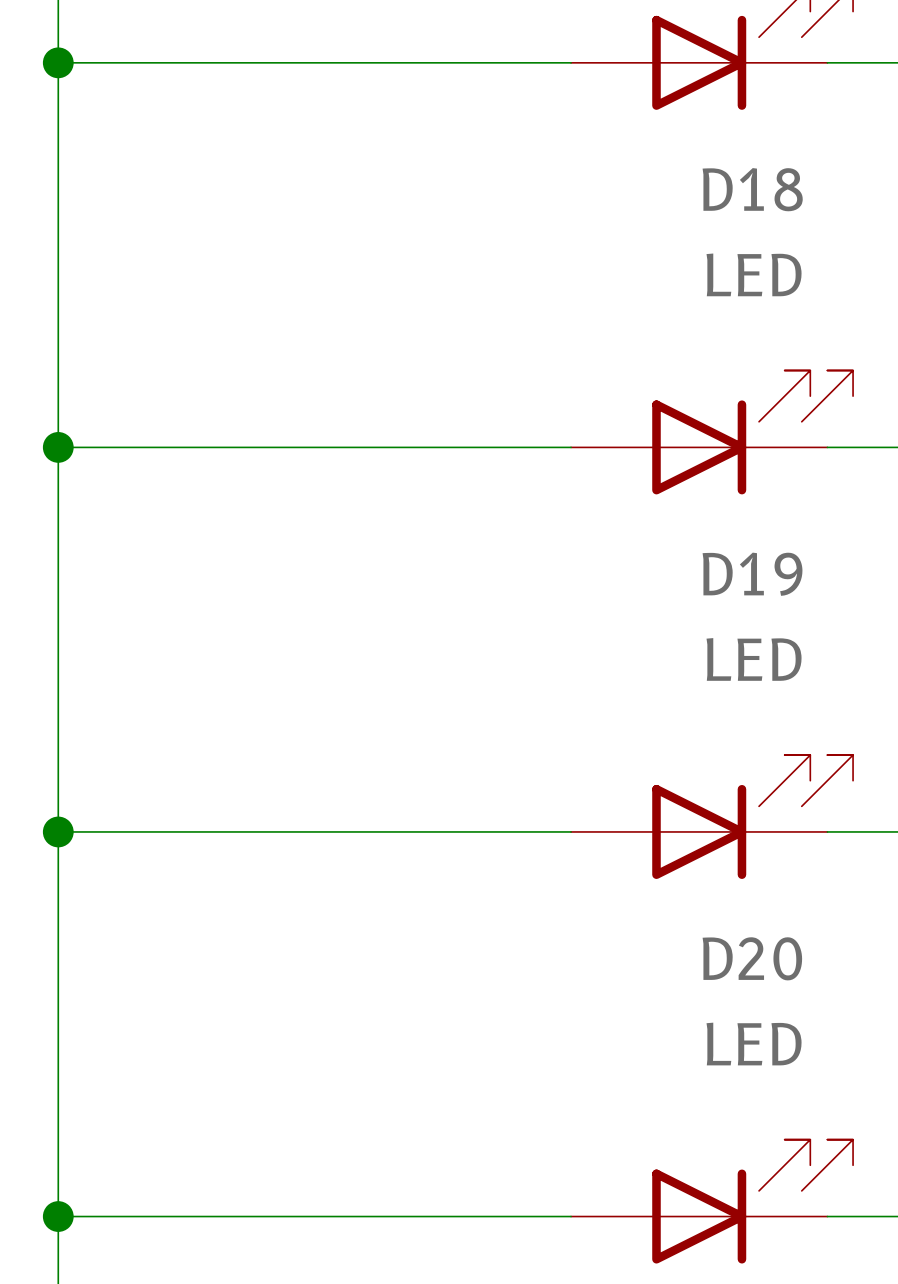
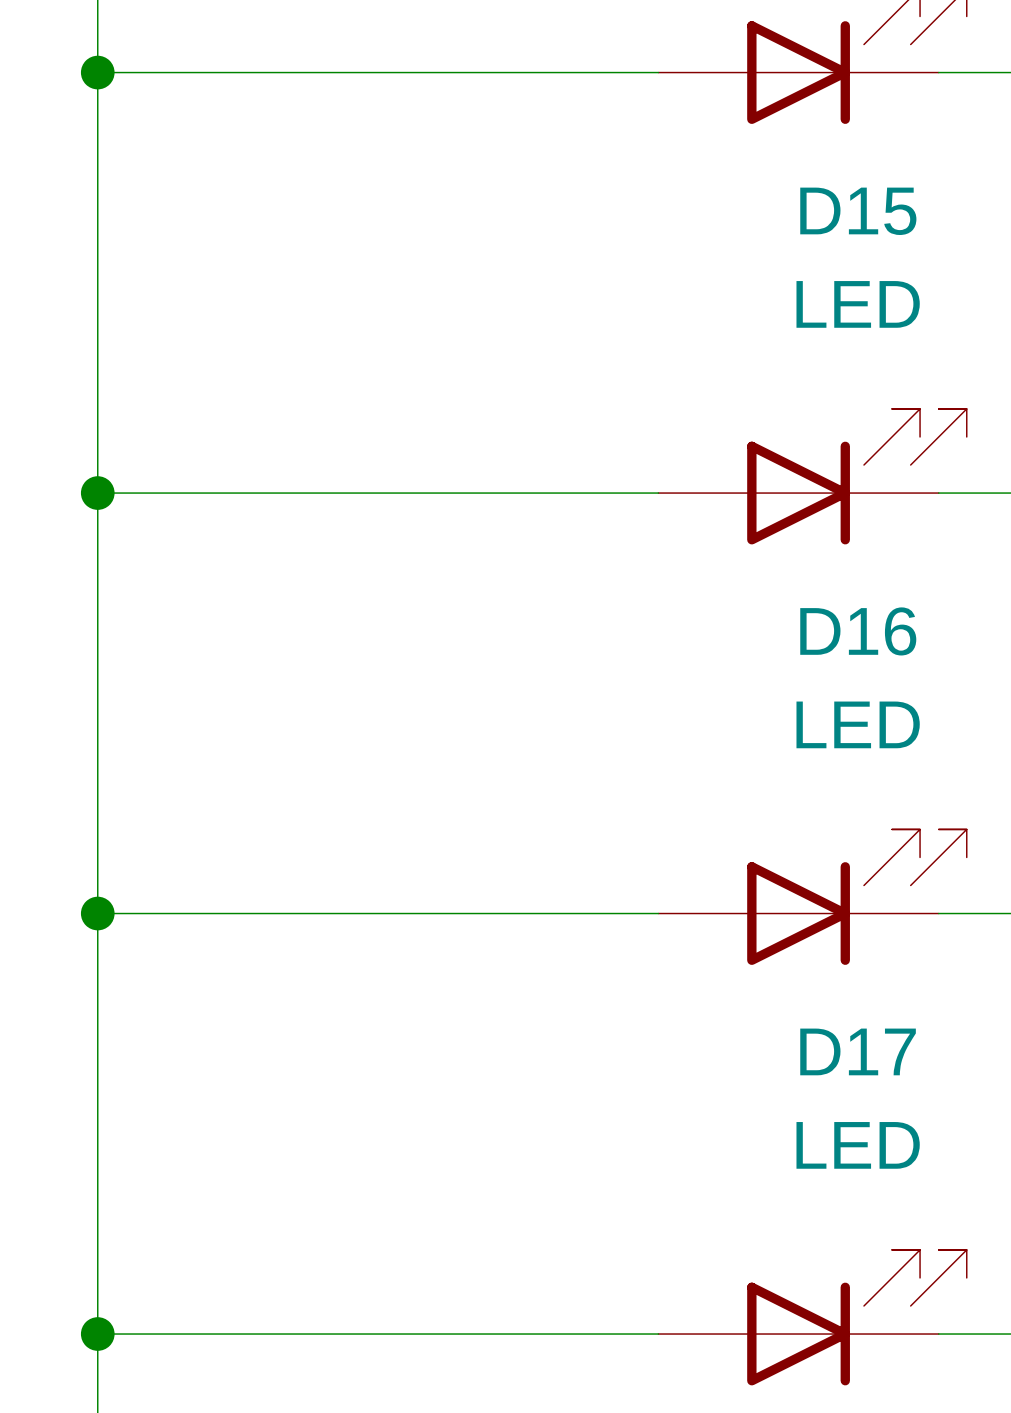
D18 name: D18 (752, 189) -> D15 (858, 211)
D19 name: D19 (752, 574) -> D16 (858, 631)
D20 name: D20 (752, 958) -> D17 (858, 1051)

